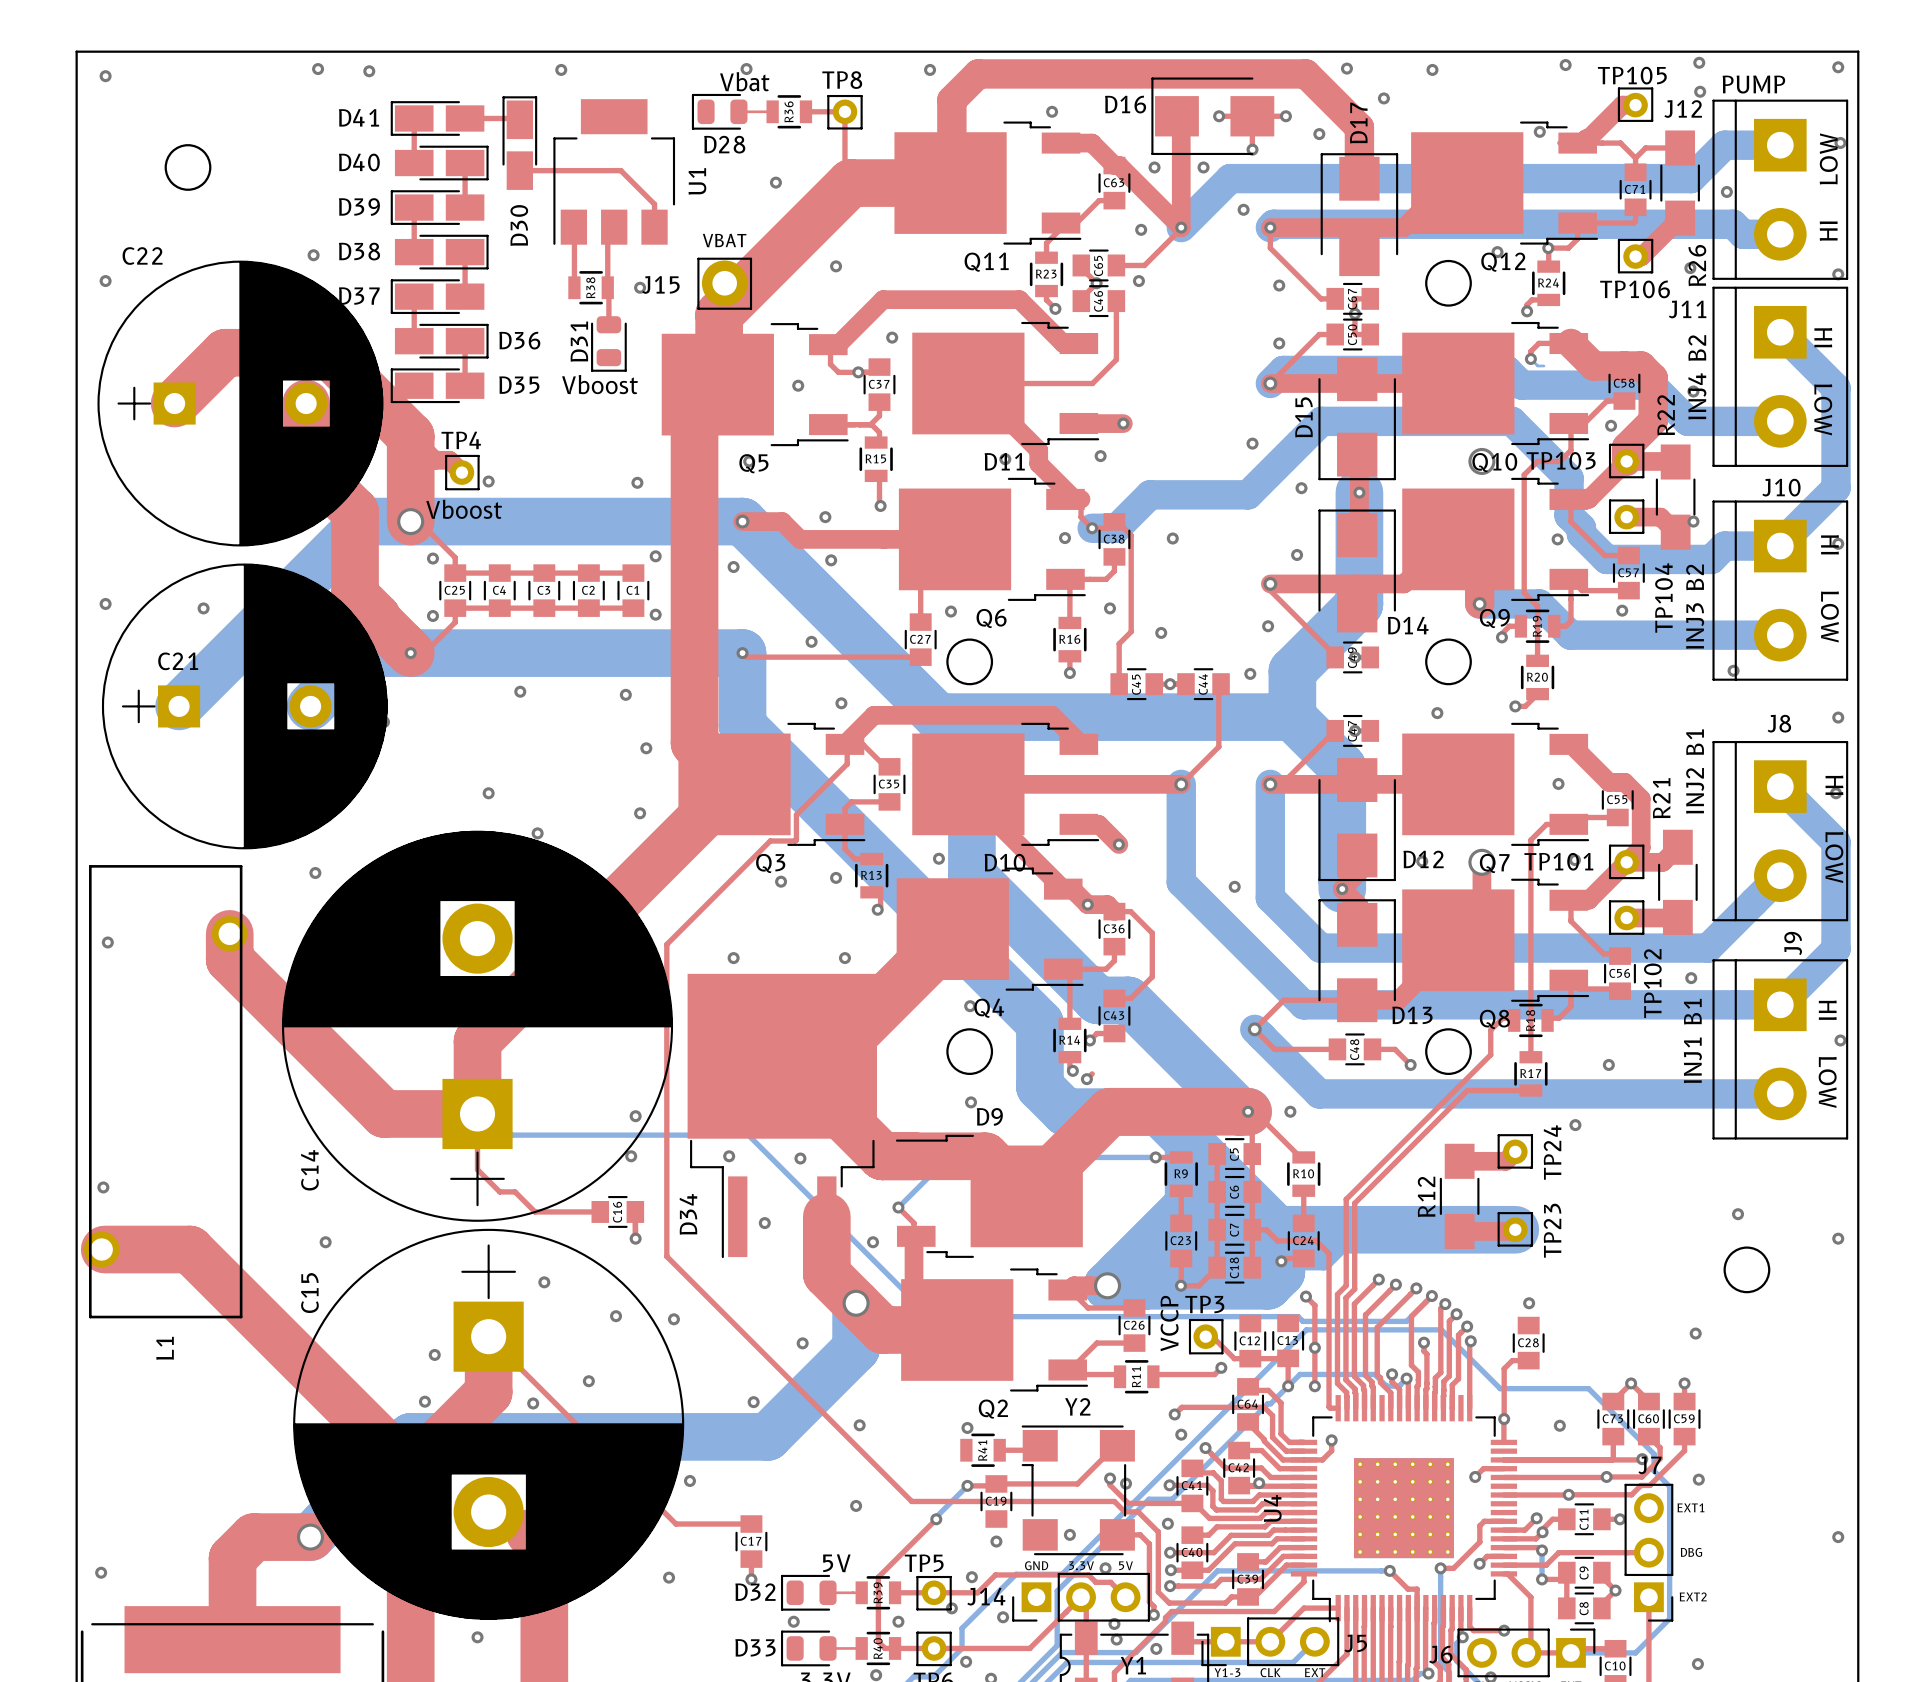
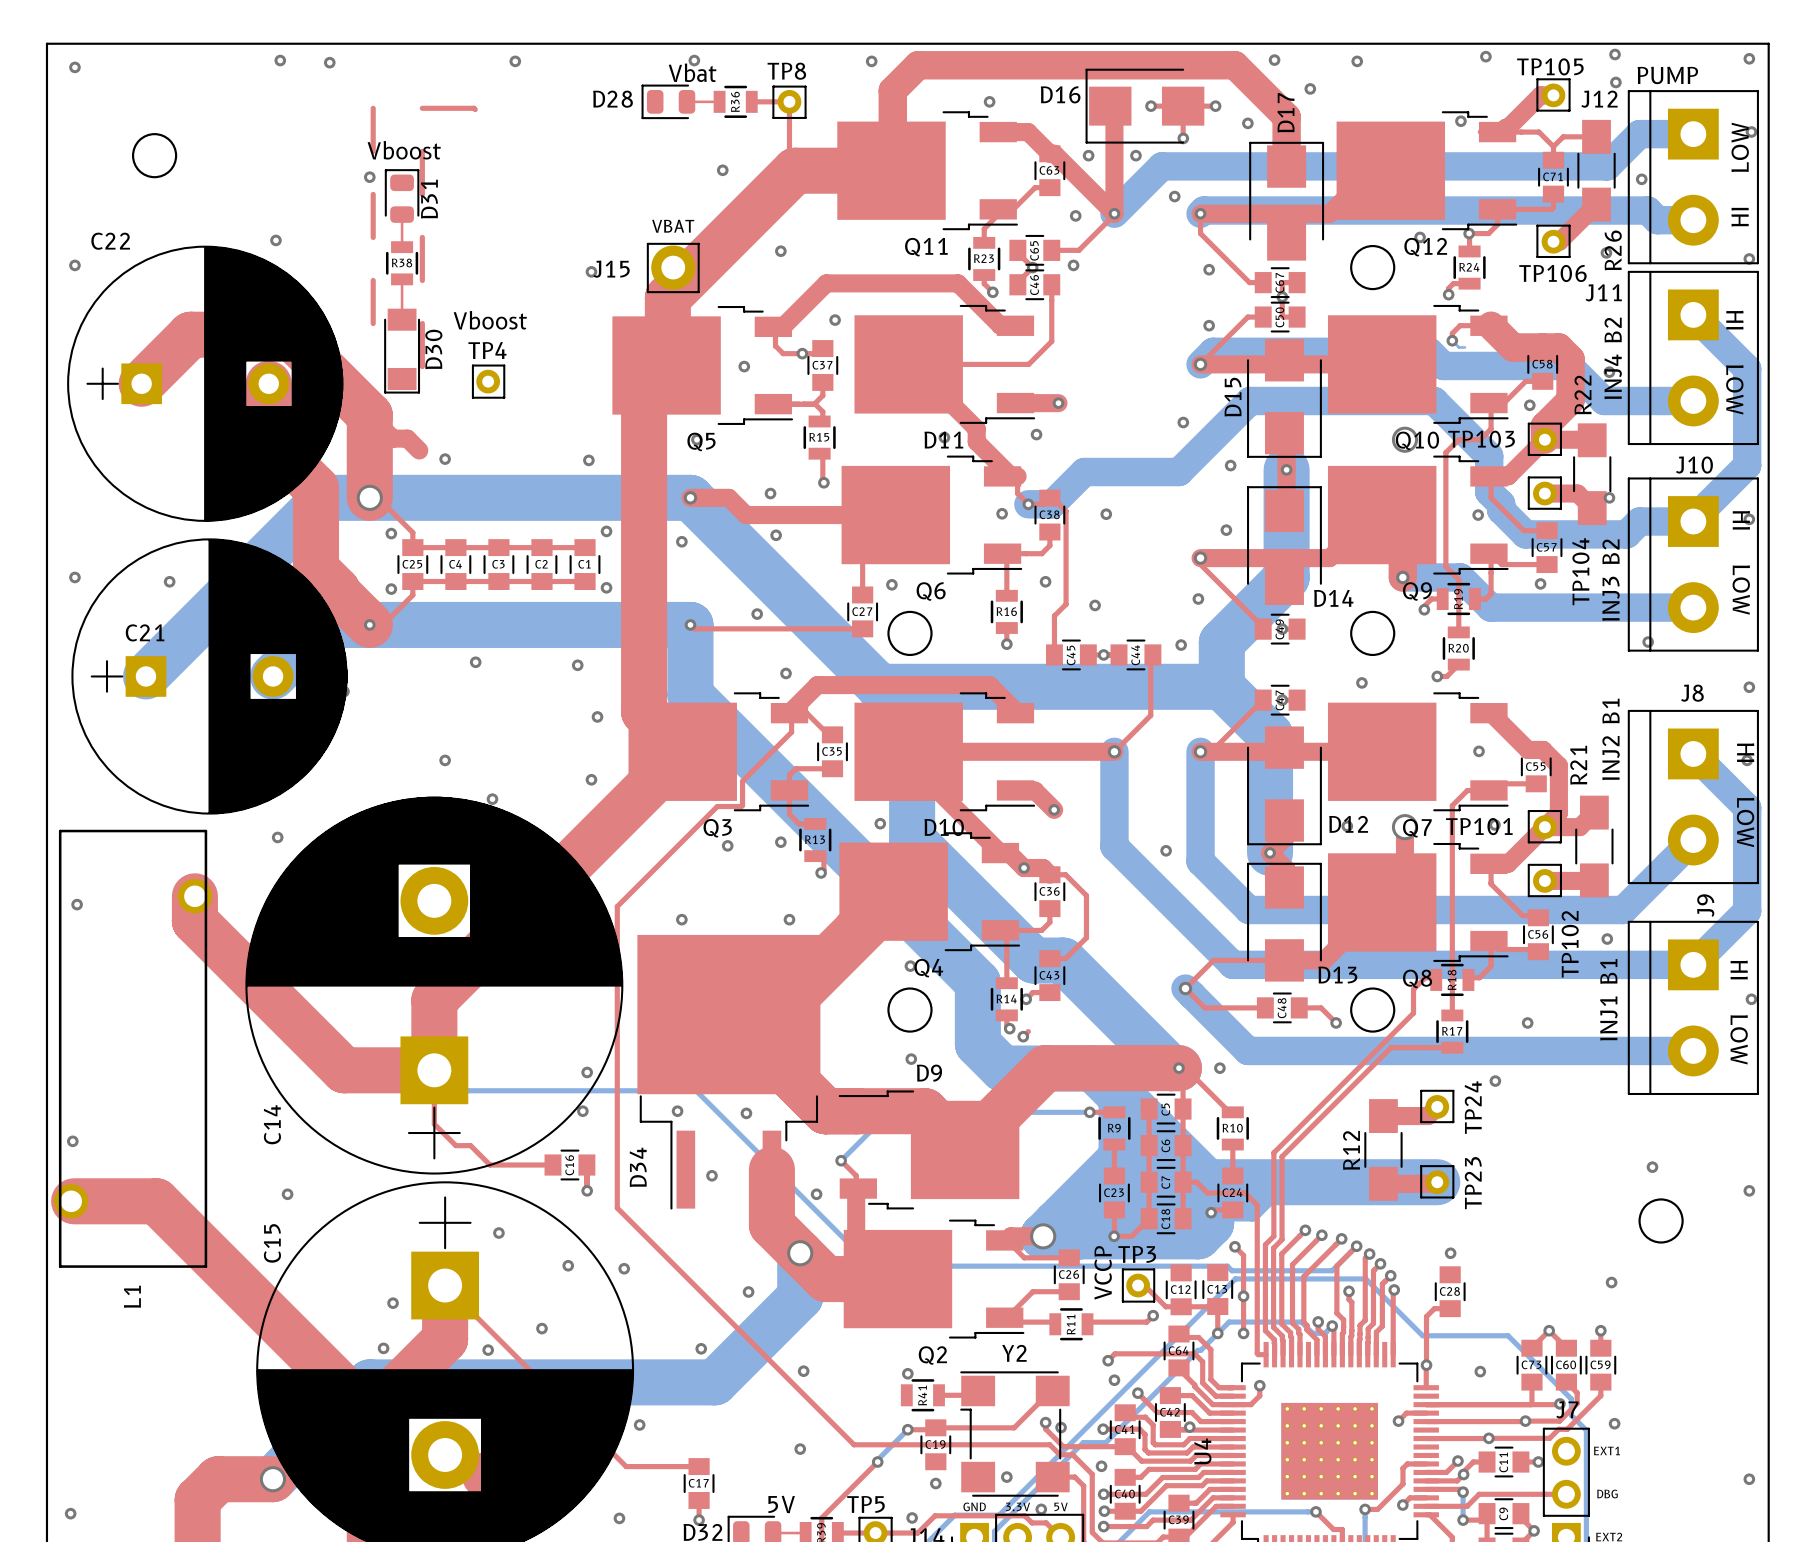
D30 footprint: [502, 96, 538, 190] -> [384, 308, 421, 394]
D41: (437, 118) -> none
D28 name position: D28 (724, 144) -> D28 (613, 99)
text: none -> Vboost (404, 150)
D40: (441, 163) -> none
top track: (519, 170) (620, 170) (654, 204) (654, 227) -> none
U1: (614, 172) -> none
via: none -> (369, 177)
D39: (437, 207) -> none
D30 name position: D30 (519, 225) -> D30 (433, 349)
top track: (573, 227) (574, 287) -> none
top track: (614, 227) (607, 233) (608, 324) -> none
top track: none -> (402, 214) (402, 247)
D38: (441, 252) -> none
R38 rotation: 0° (591, 287) -> 90° clockwise (402, 263)
R38 position: (591, 287) -> (402, 263)
top track: none -> (402, 279) (402, 319)
D37: (437, 296) -> none
D36: (441, 341) -> none
D31 rotation: 0° (608, 343) -> 180° (402, 195)
D31 position: (608, 343) -> (402, 195)
text position: Vboost (599, 384) -> Vboost (490, 320)
D35: (437, 385) -> none
TP4 position: (462, 472) -> (488, 381)
text: Vboost (464, 509) -> none

